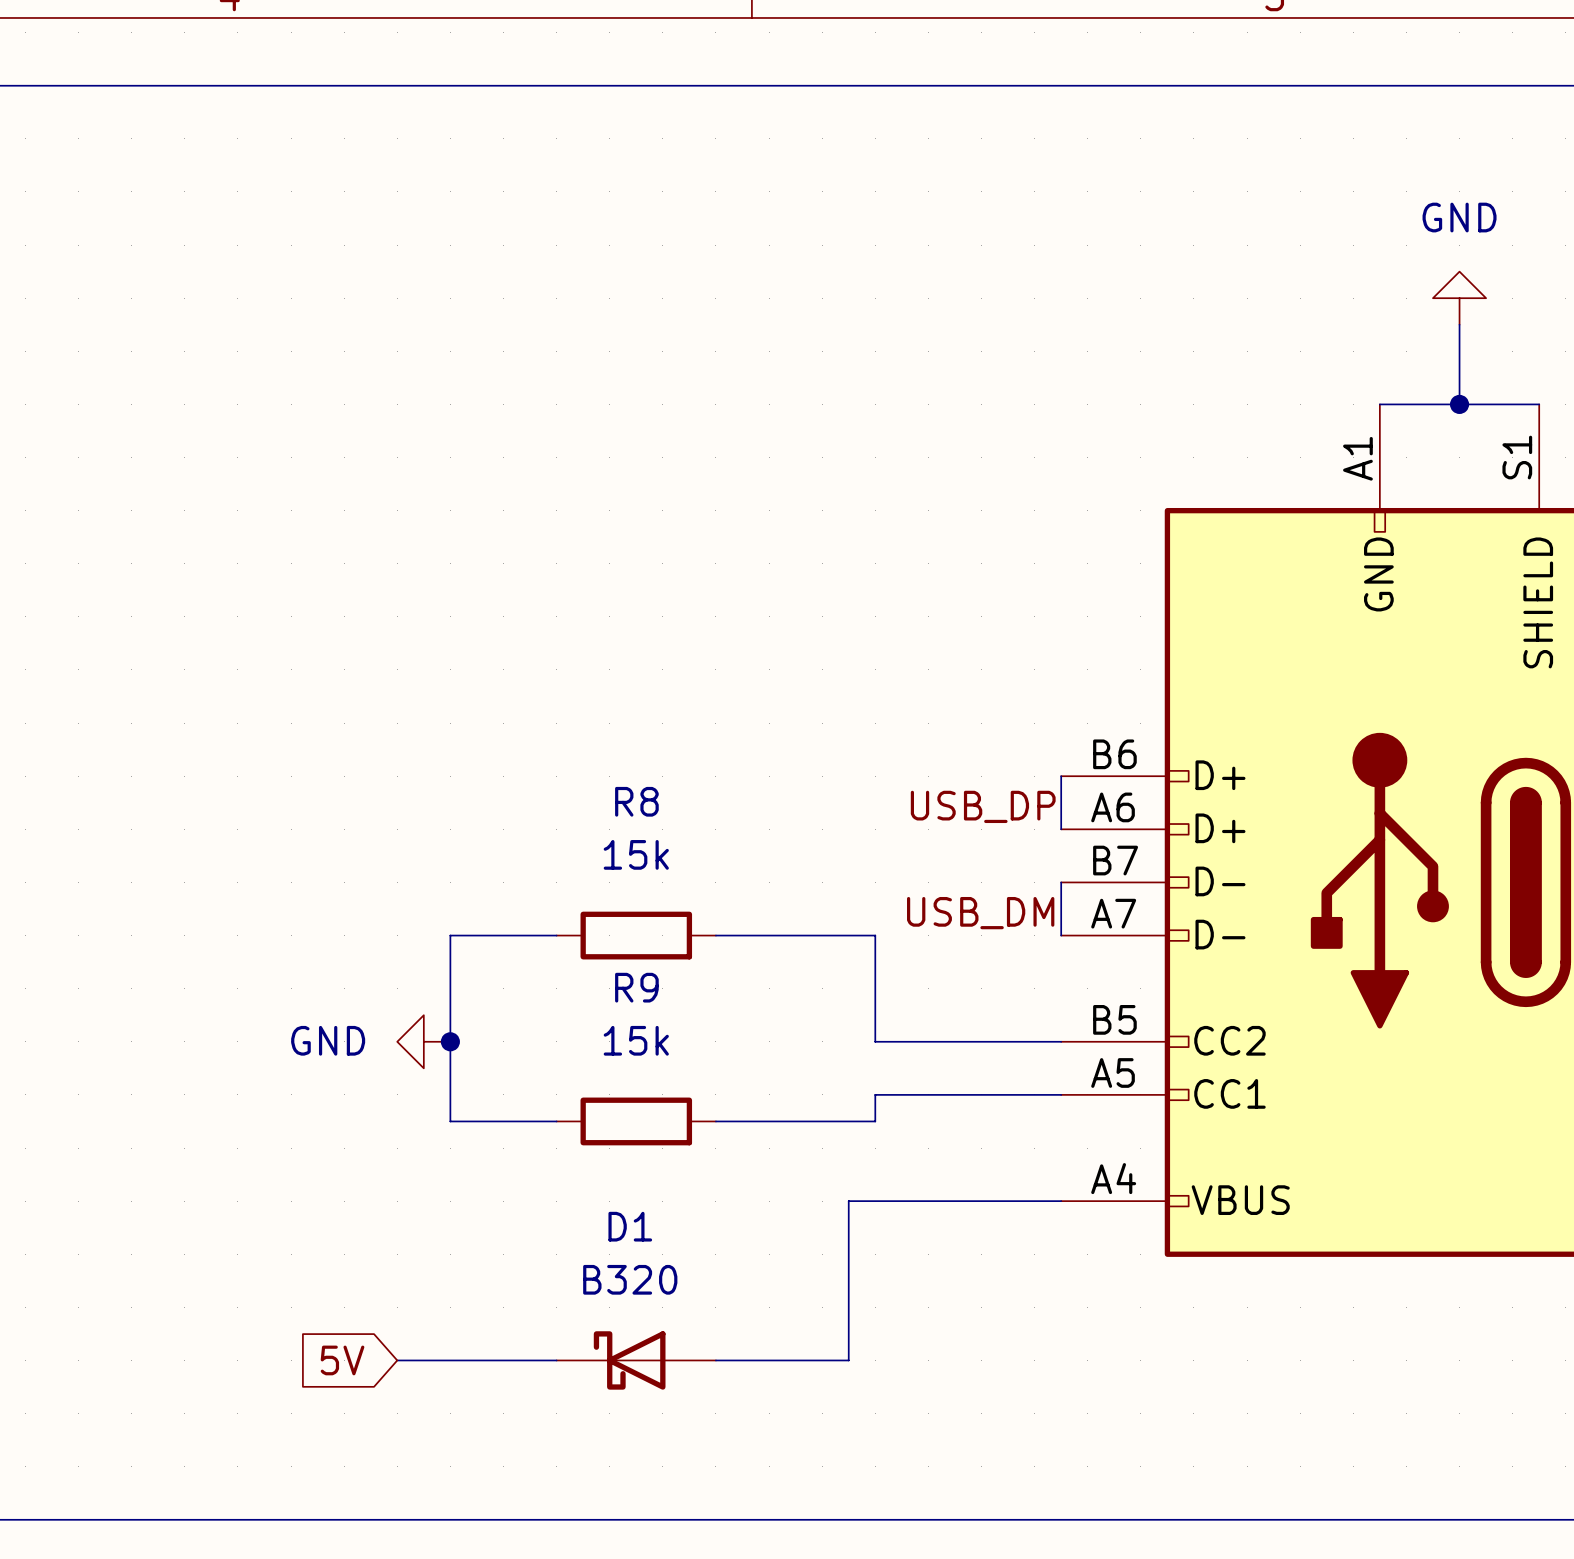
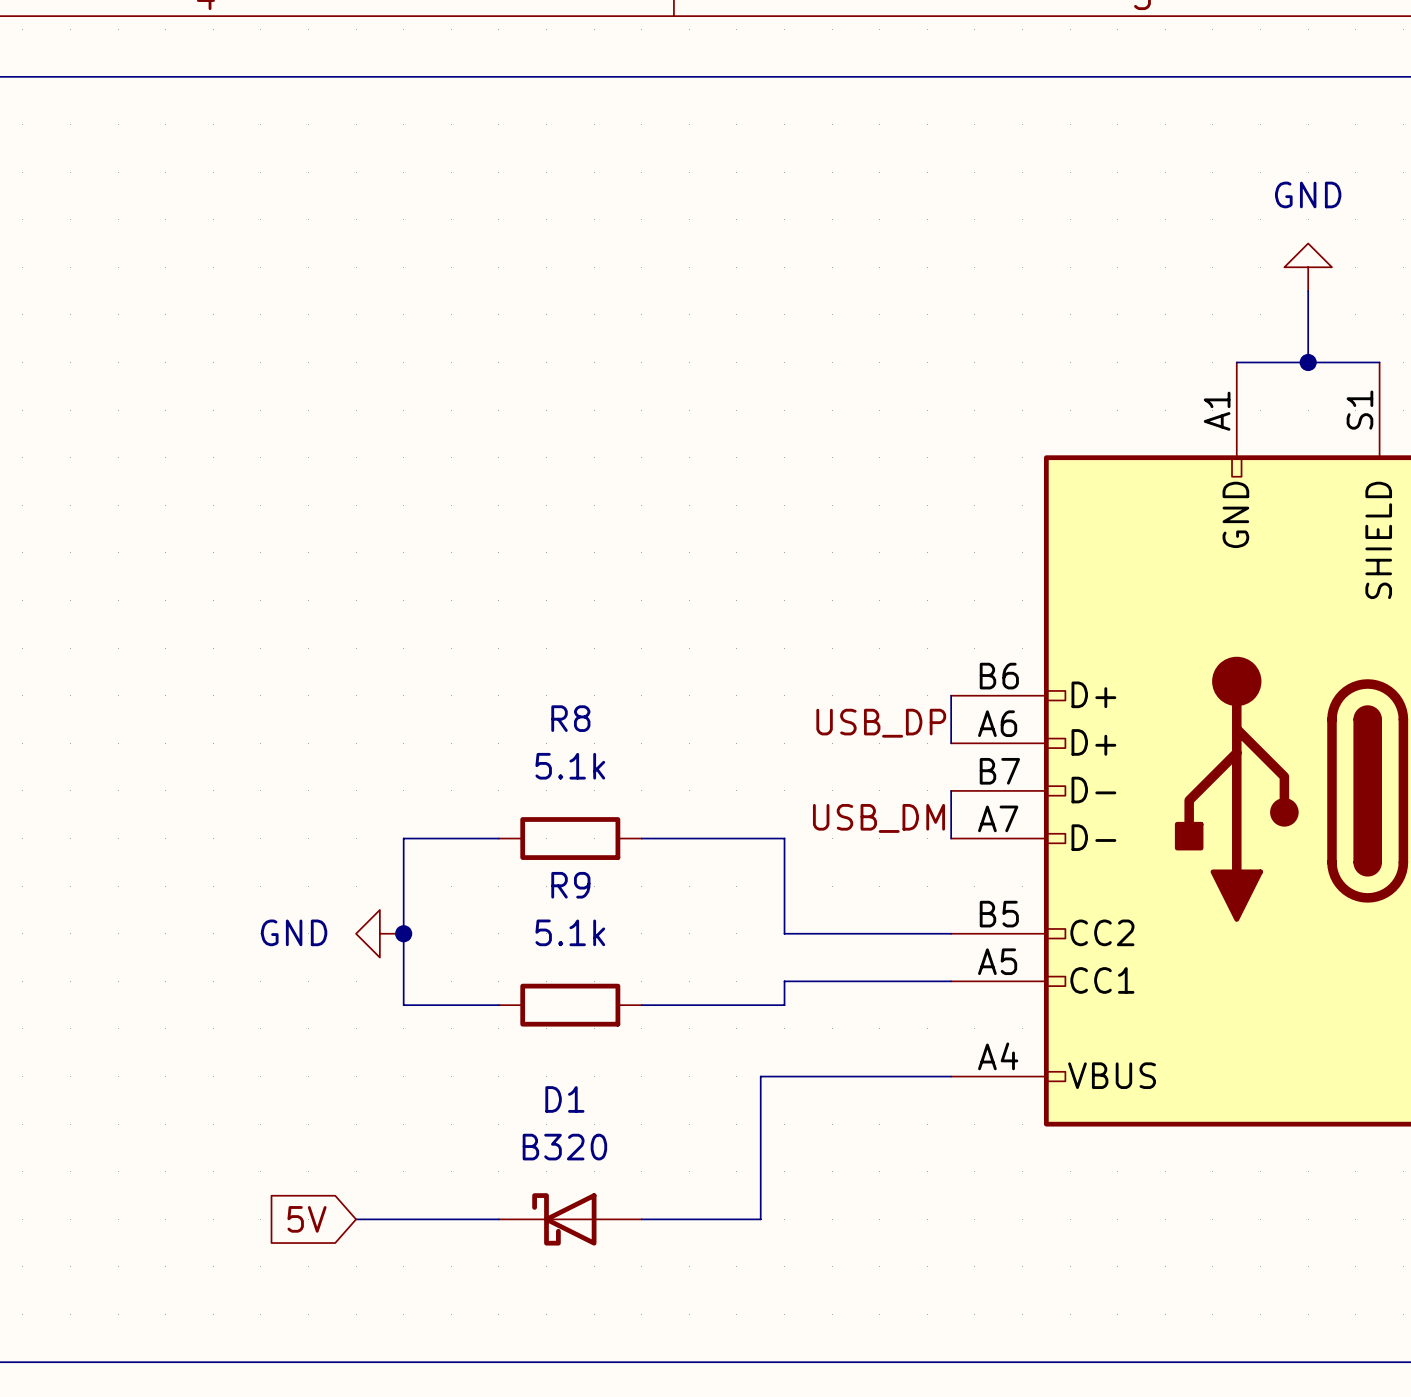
R8 value: 15k (636, 854) -> 5.1k (570, 766)
R9 value: 15k (636, 1040) -> 5.1k (570, 932)

